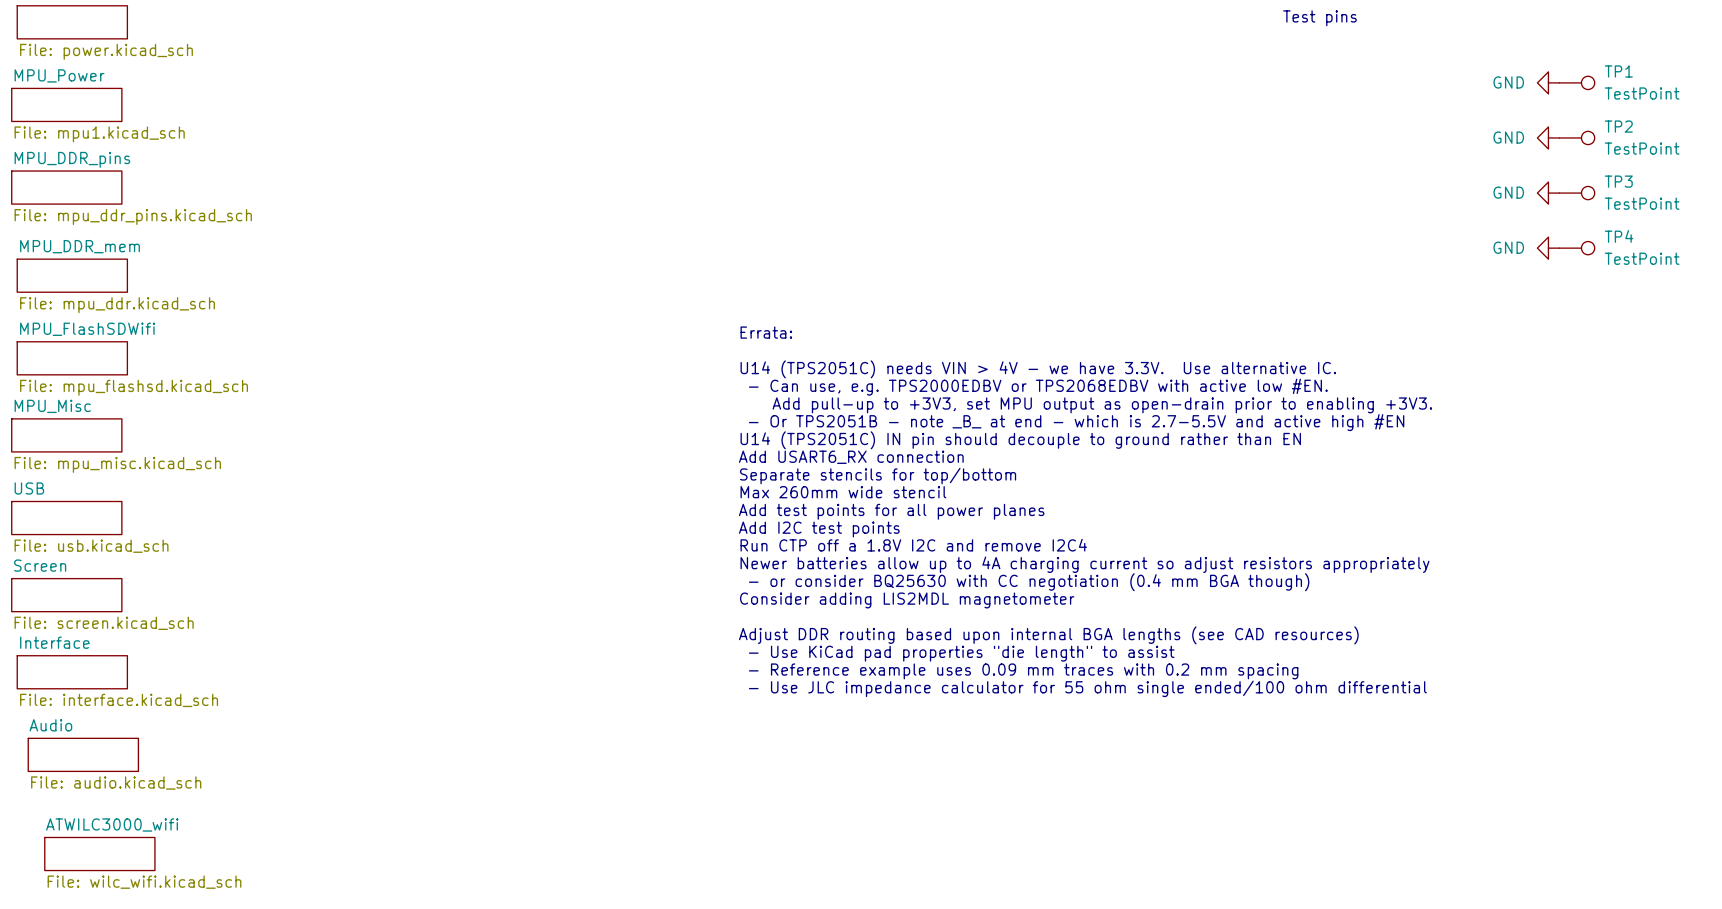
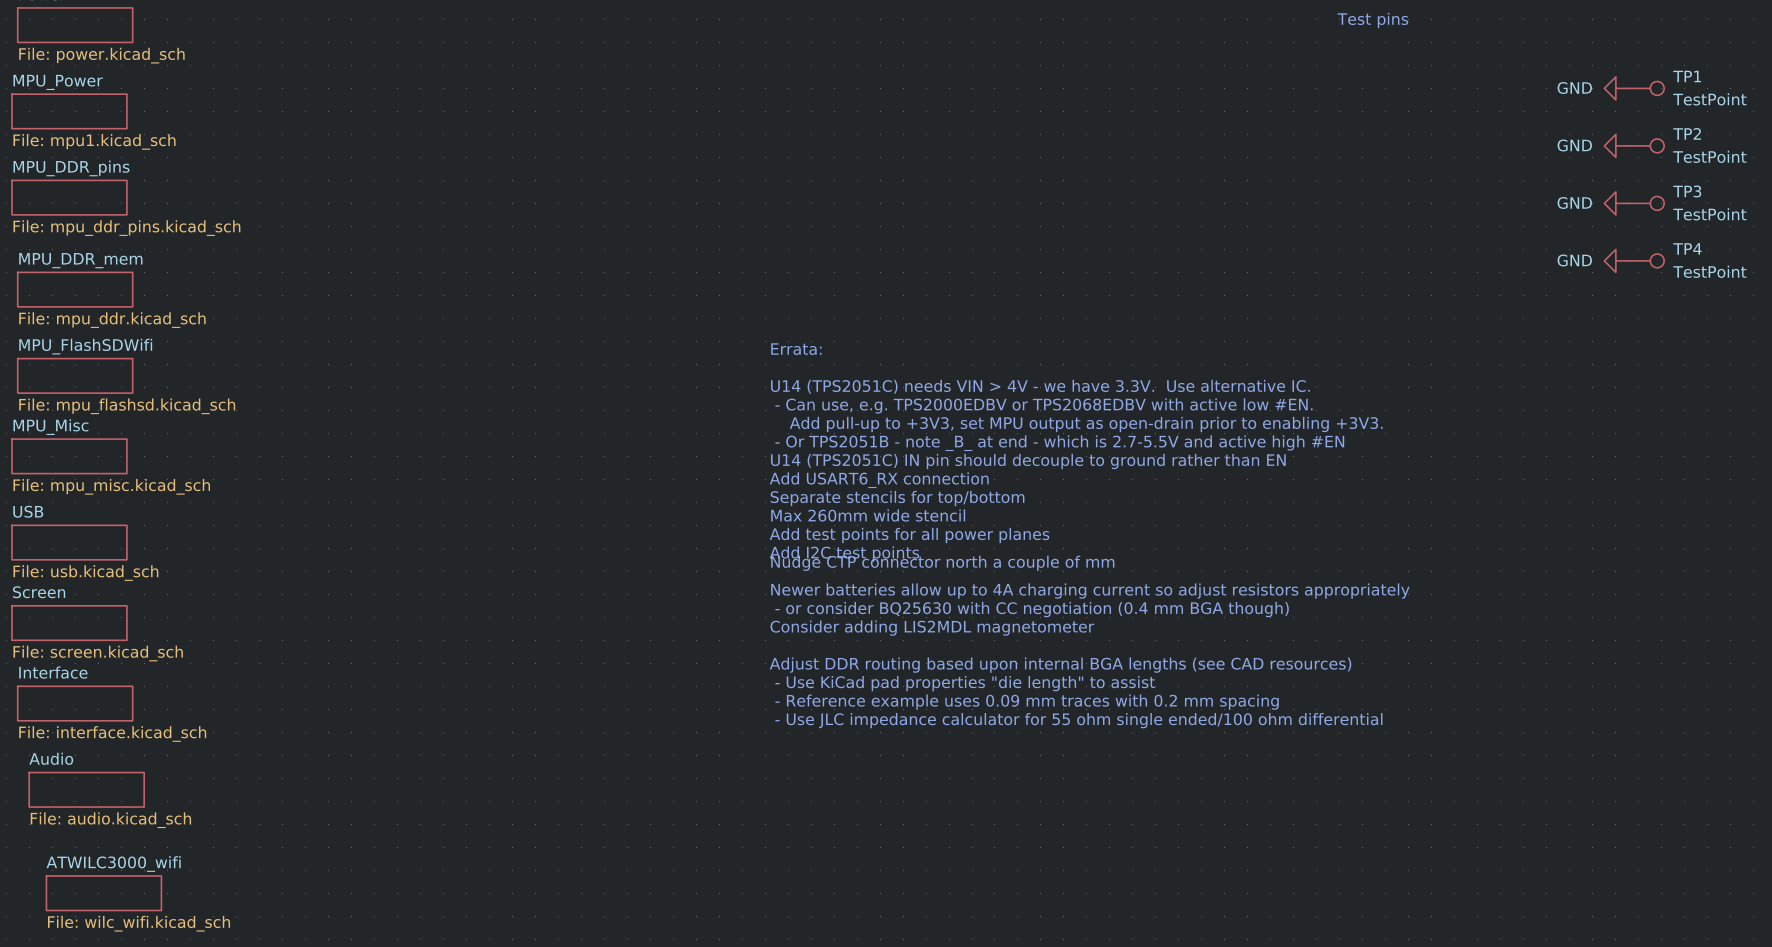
text: none -> Nudge CTP connector north a couple of mm (942, 563)
text: Run CTP off a 1.8V I2C and remove I2C4 (913, 545) -> none

